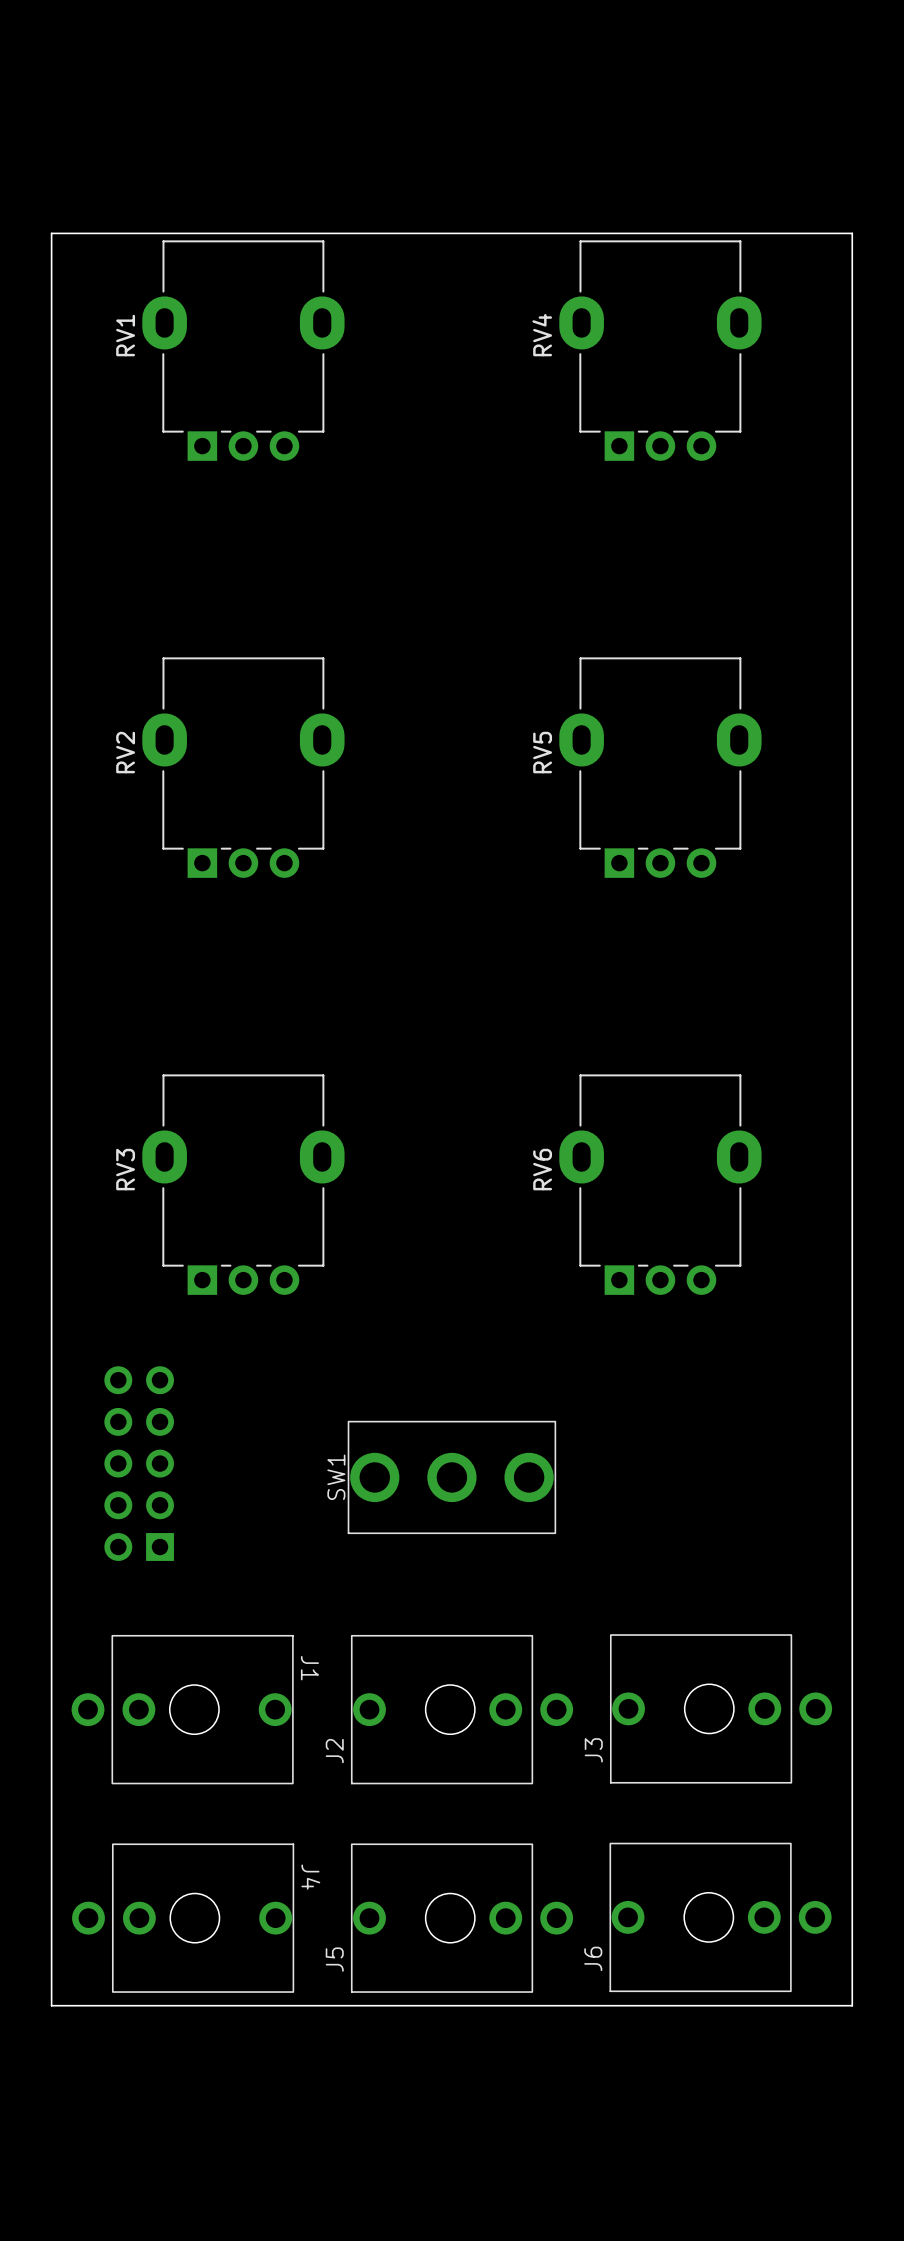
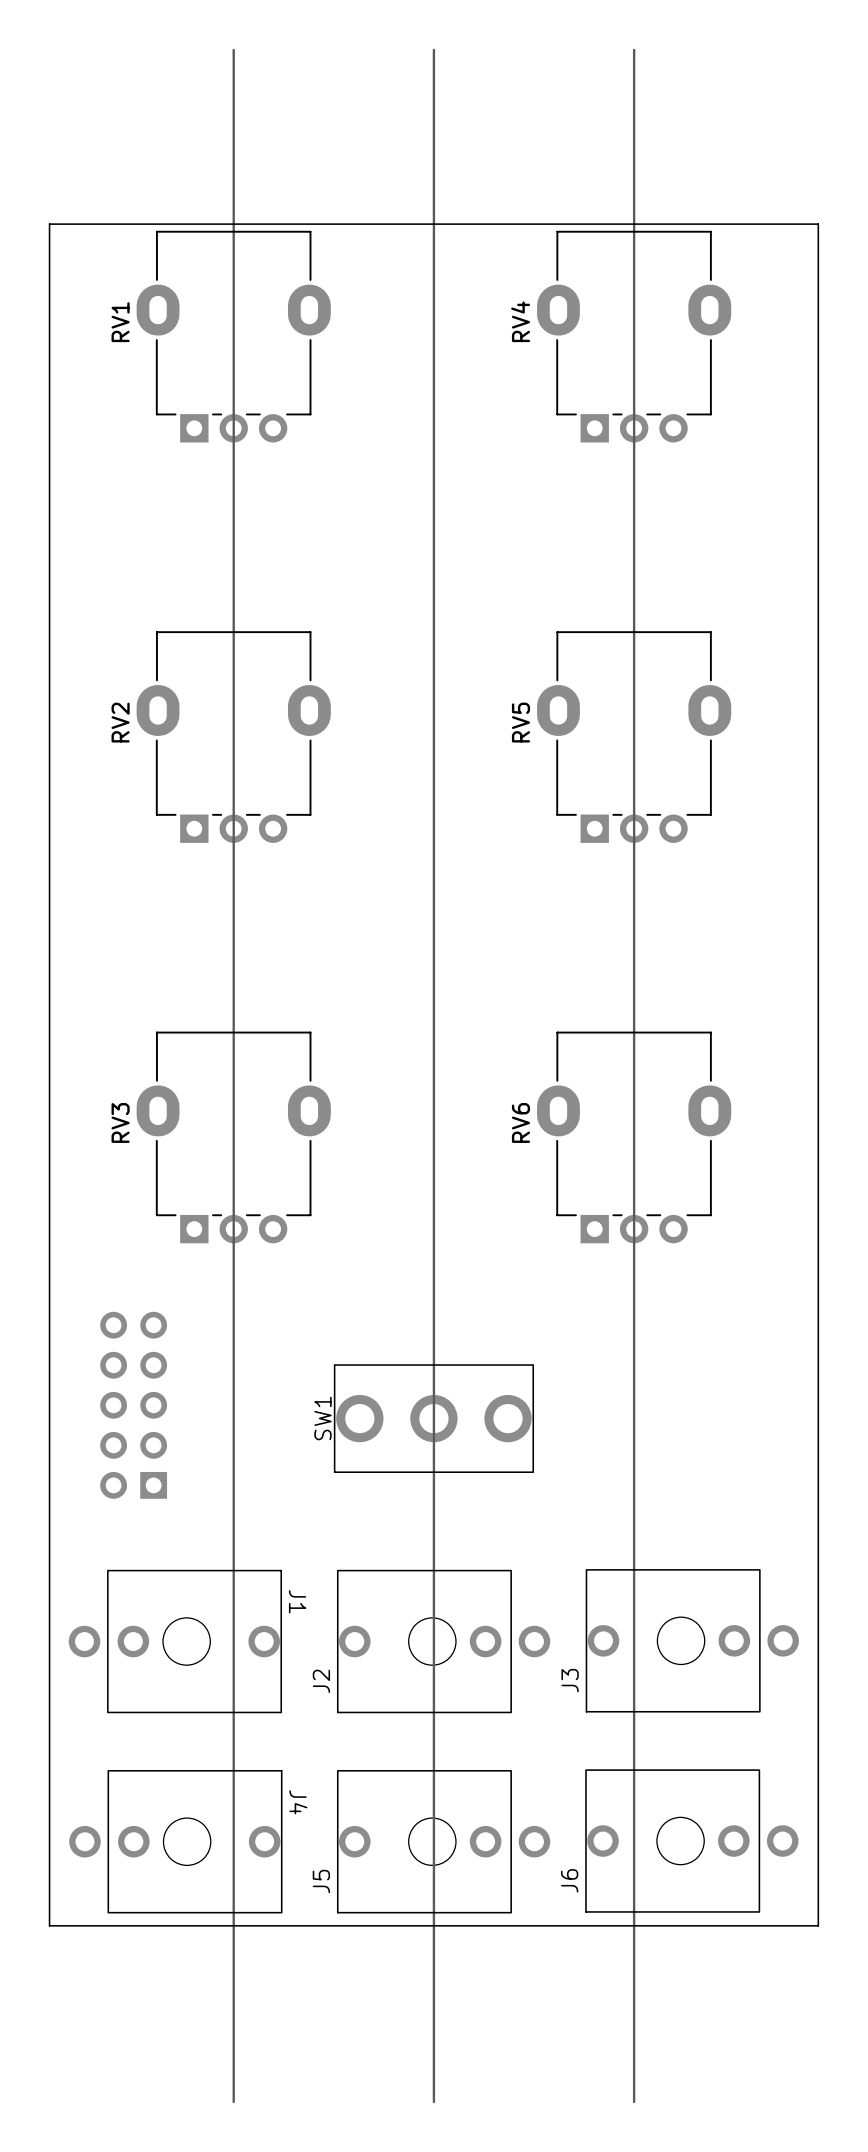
line: none -> (233, 49) (233, 2102)
line: none -> (433, 49) (433, 2102)
line: none -> (634, 49) (634, 2102)

